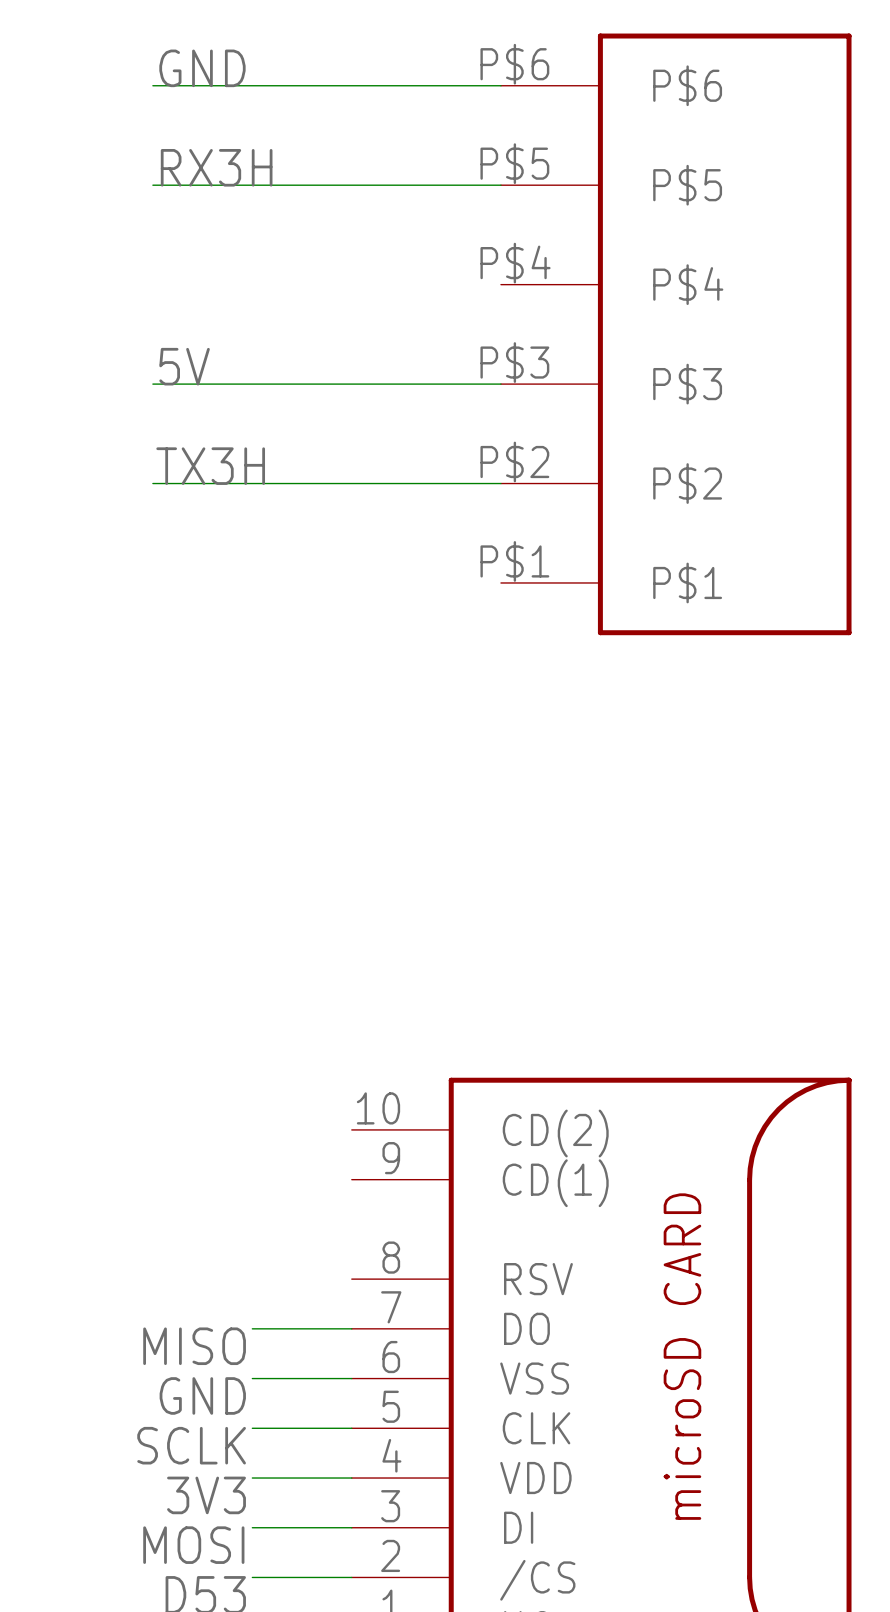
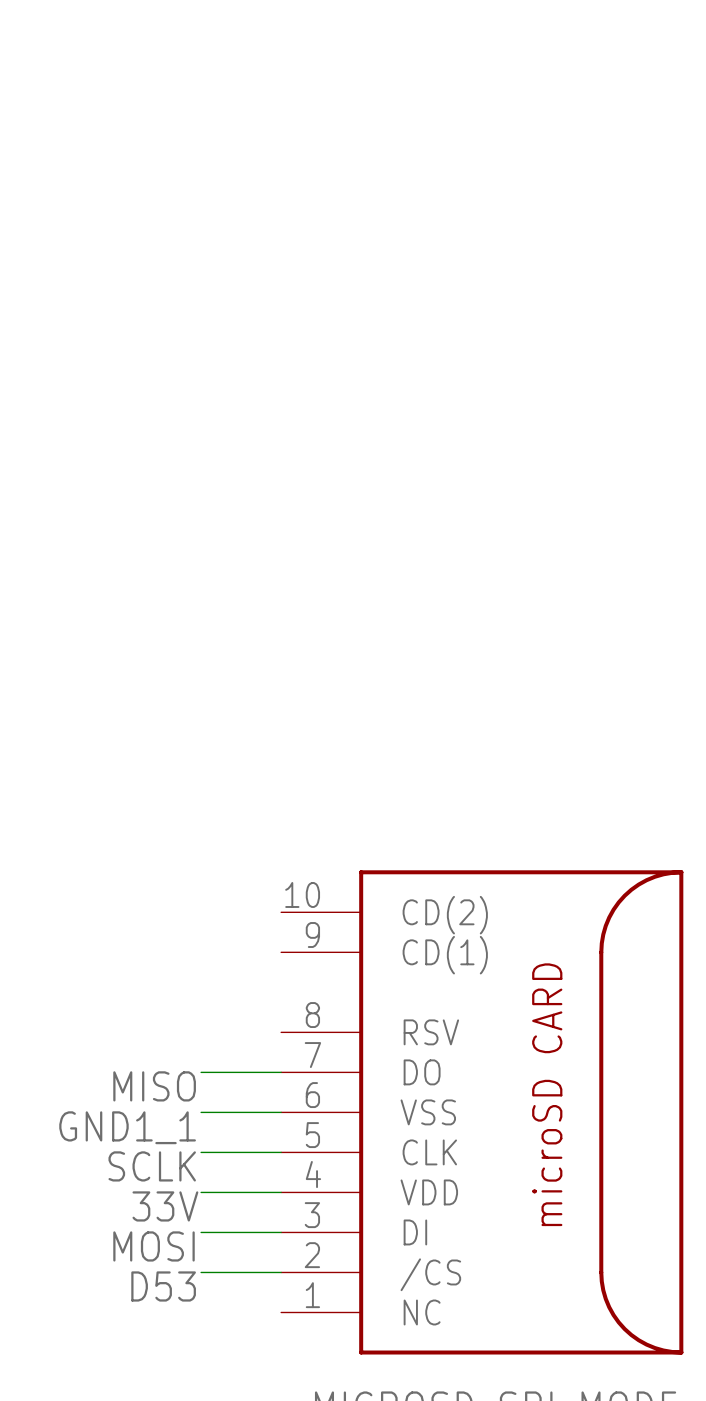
label: GND (202, 68) -> none
wire: (152, 85) (500, 85) -> none
label: RX3H (216, 167) -> none
wire: (152, 185) (500, 185) -> none
part: (676, 334) -> none
label: 5V (184, 366) -> none
wire: (152, 384) (500, 384) -> none
label: TX3H (210, 466) -> none
wire: (152, 483) (500, 483) -> none
label: GND (202, 1395) -> GND1_1 (127, 1127)
label: 3V3 (206, 1495) -> 33V (165, 1206)

